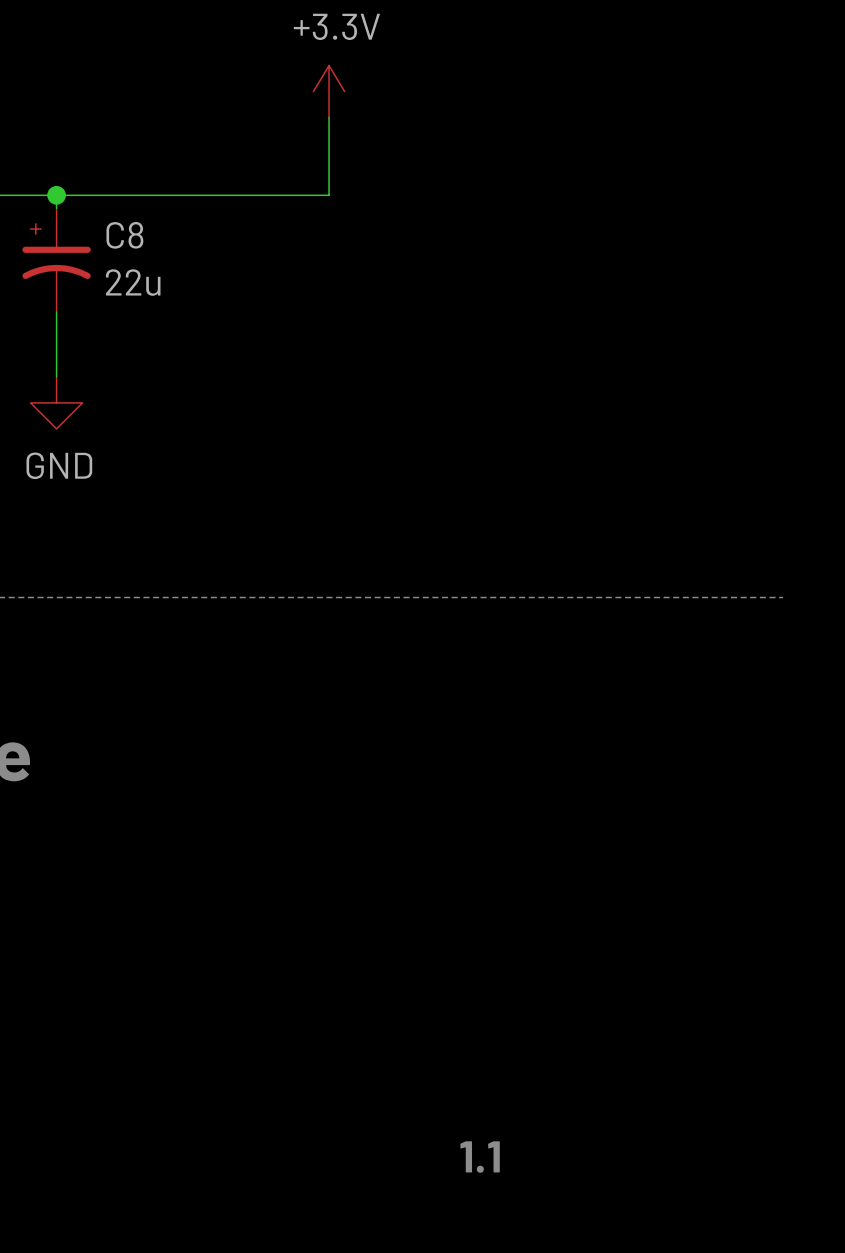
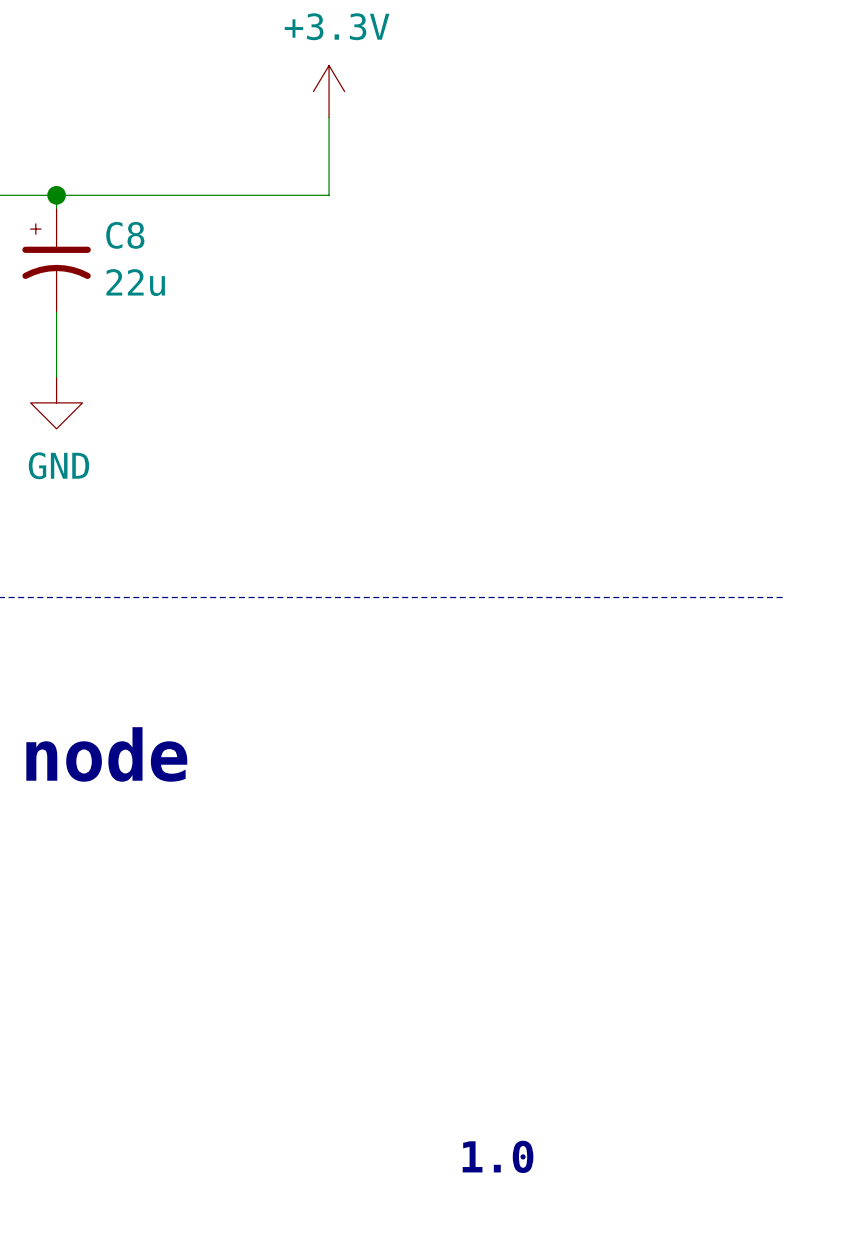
text: 1.1 (480, 1157) -> 1.0 (498, 1156)

